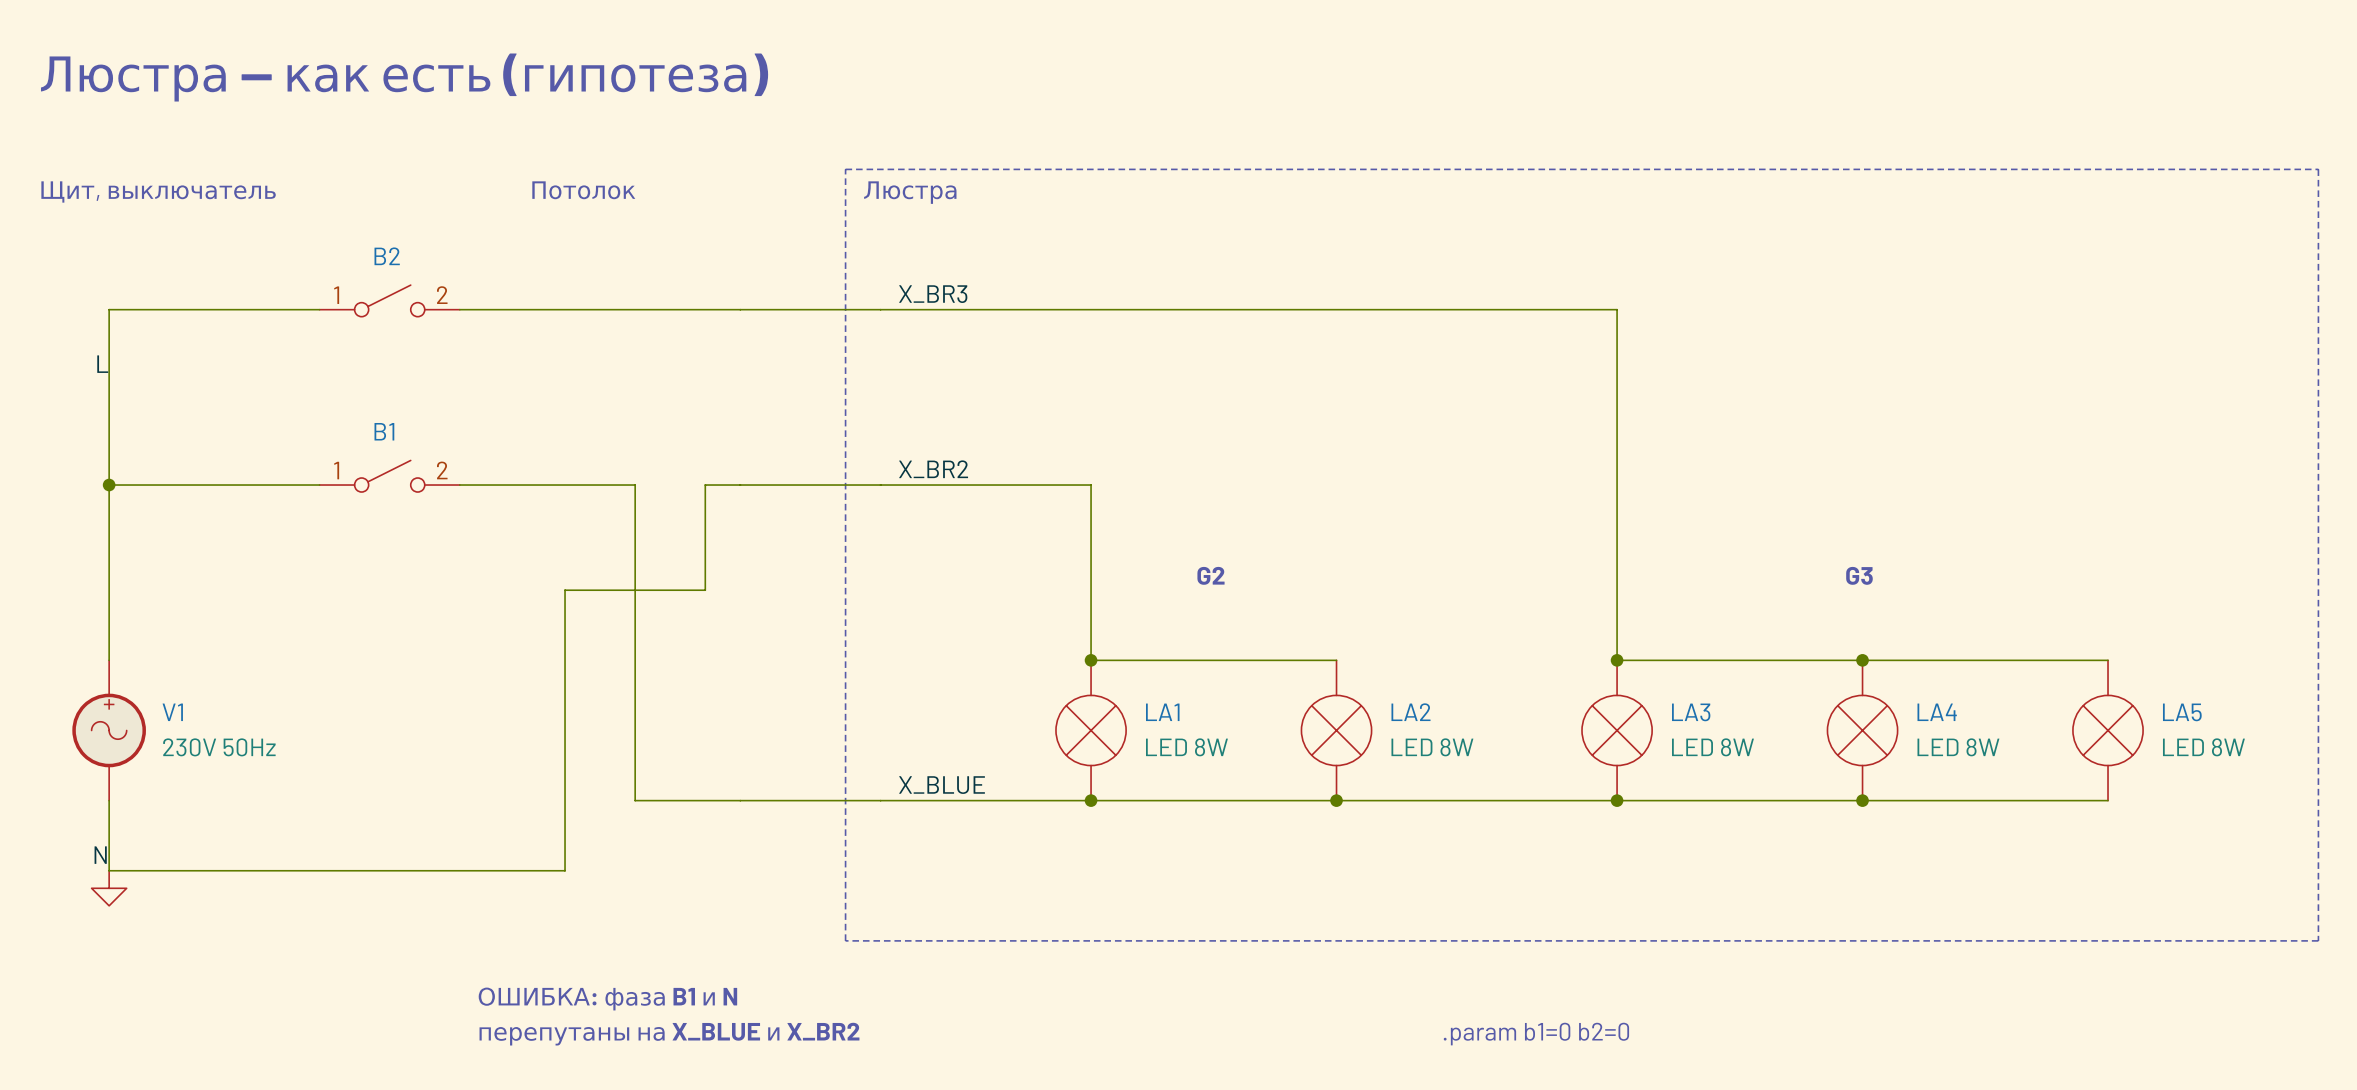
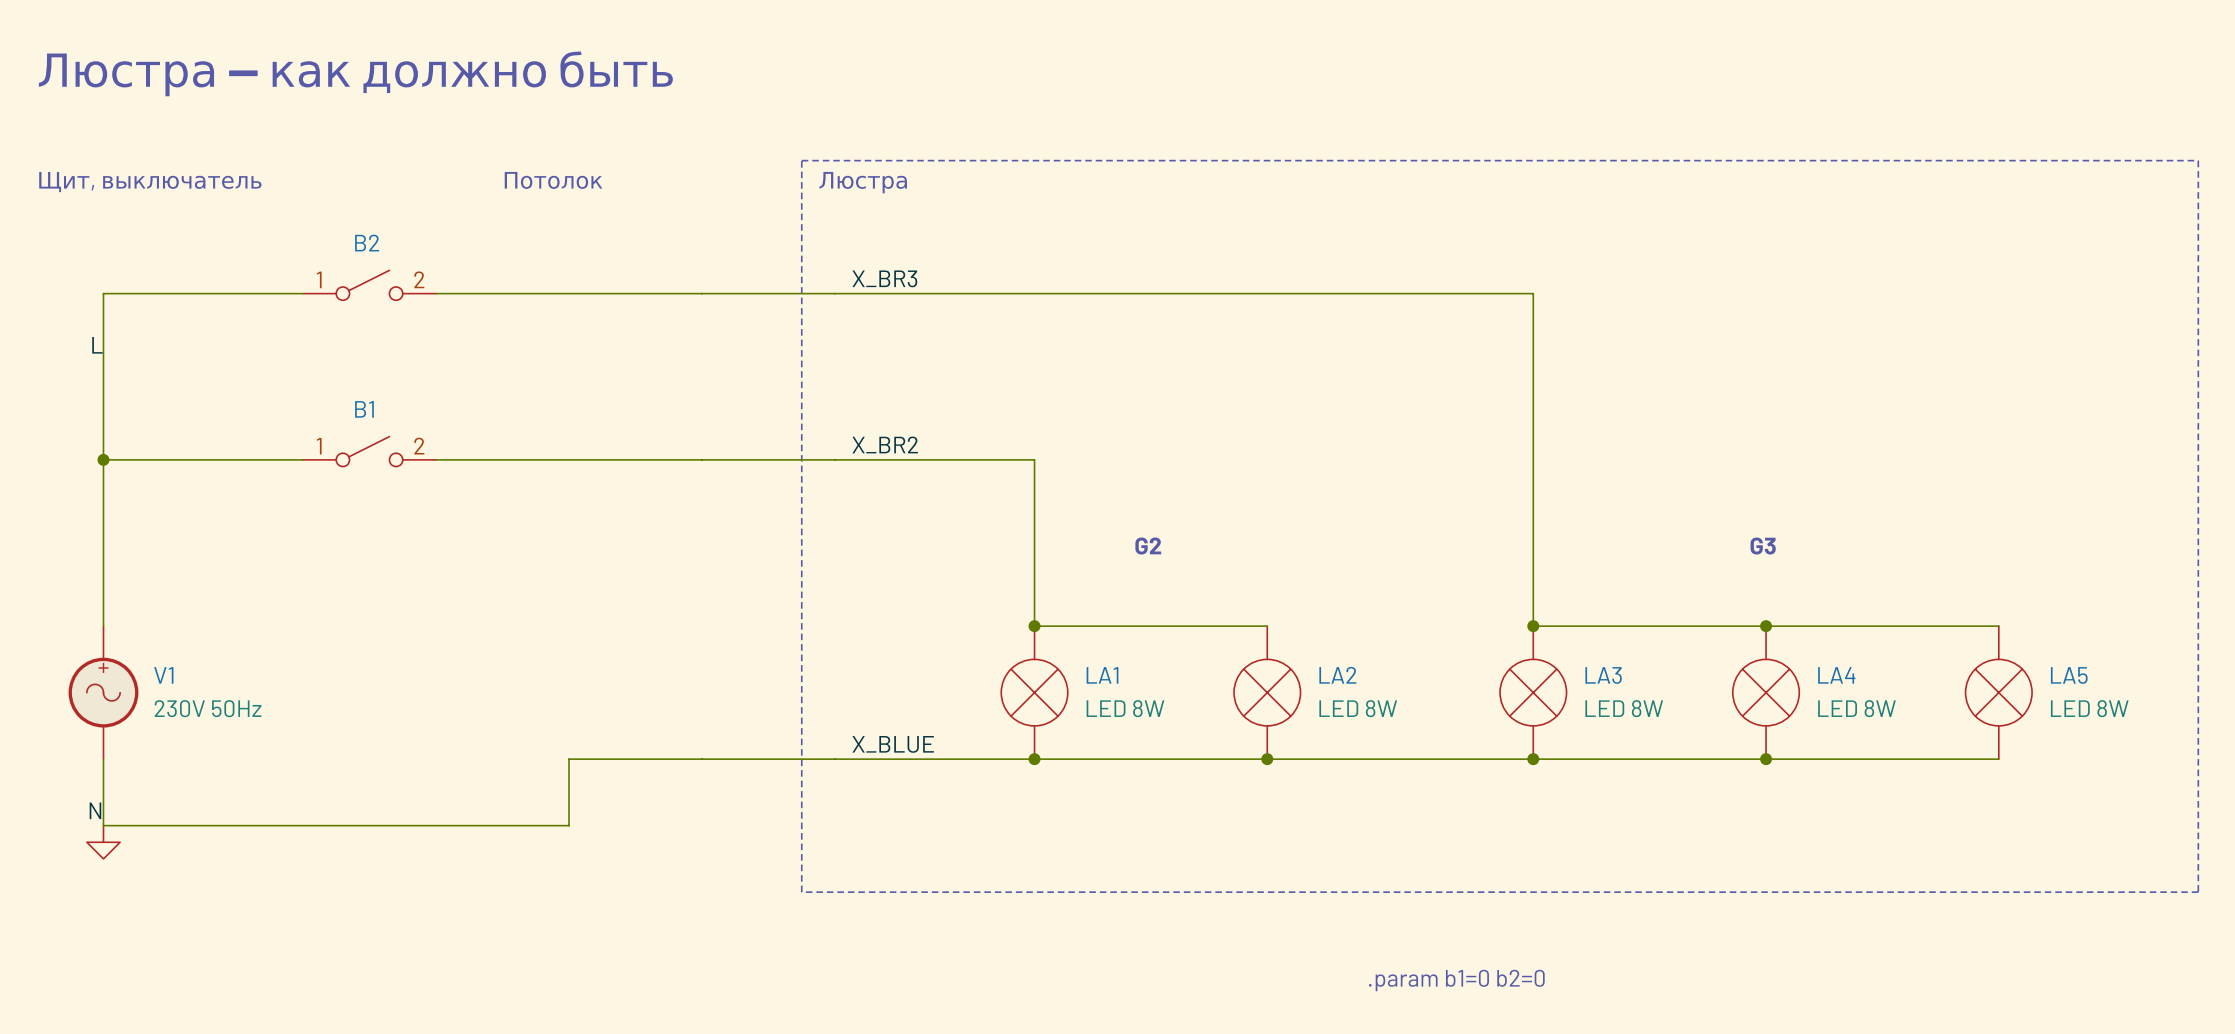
text: Люстра — как есть (гипотеза) (404, 77) -> Люстра — как должно быть (355, 73)
wire: (635, 485) (635, 800) -> (602, 459) (668, 459)
wire: (705, 485) (705, 590) (565, 590) (565, 870) -> (602, 759) (569, 759) (569, 825) (535, 825)
text: ОШИБКА: фаза B1 и N (607, 999) -> none
text: перепутаны на X_BLUE и X_BR2 (669, 1034) -> none

